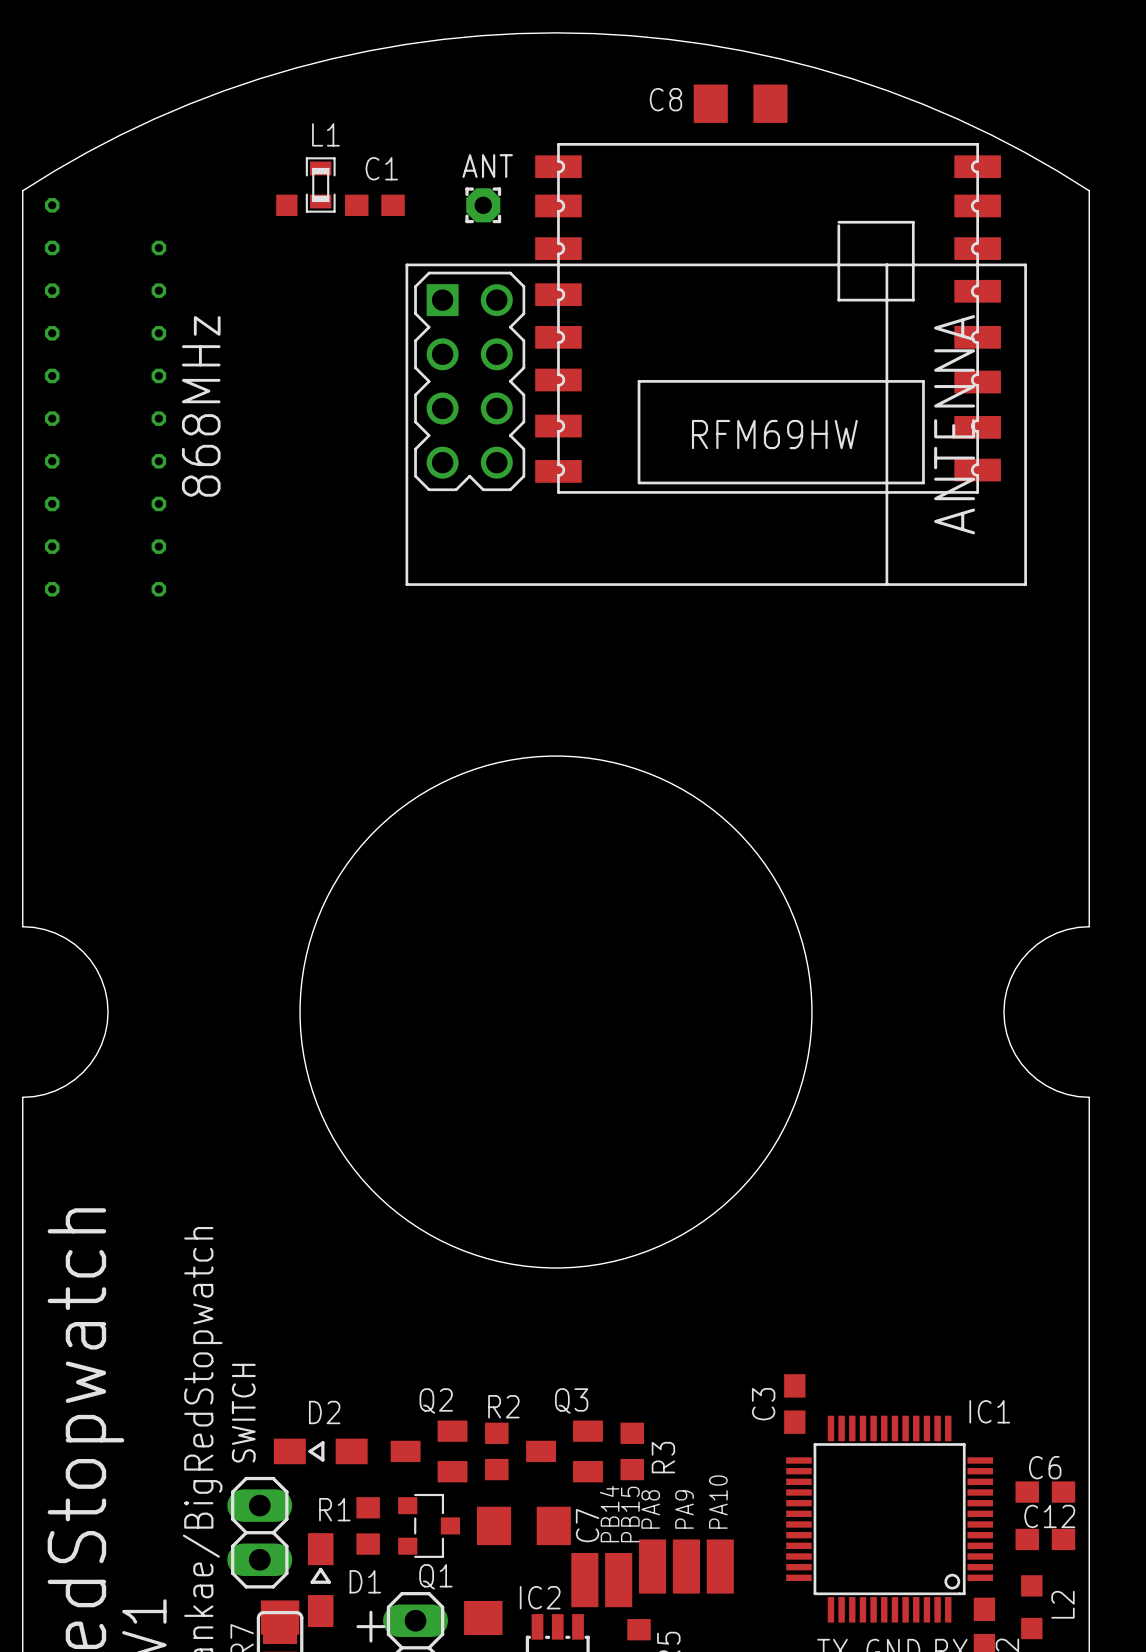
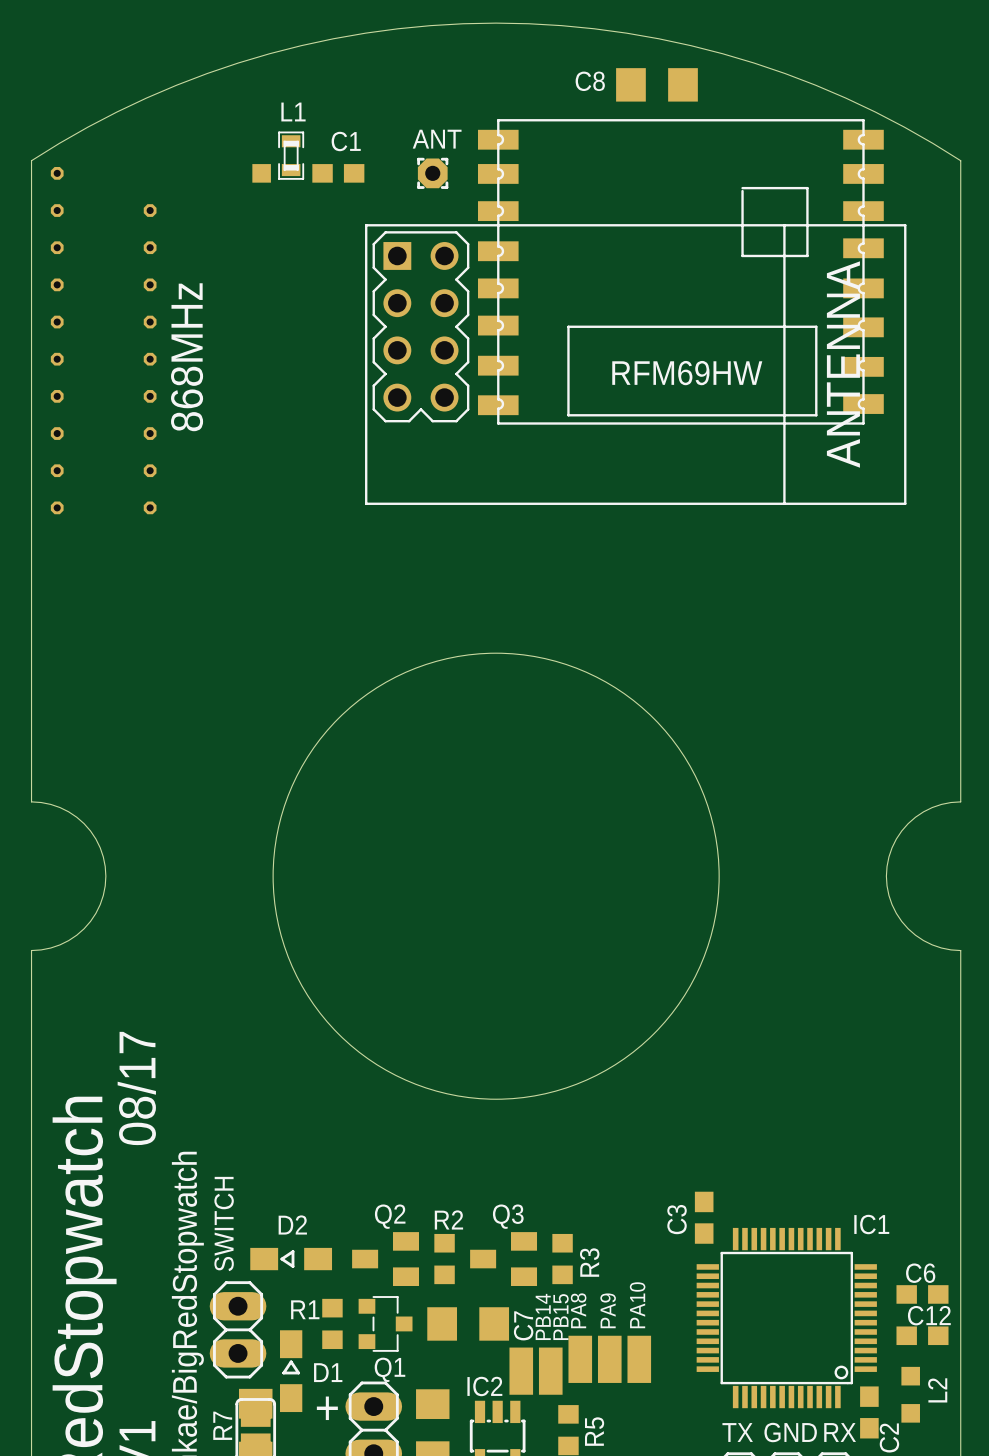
text: none -> 08/17 (136, 1088)

